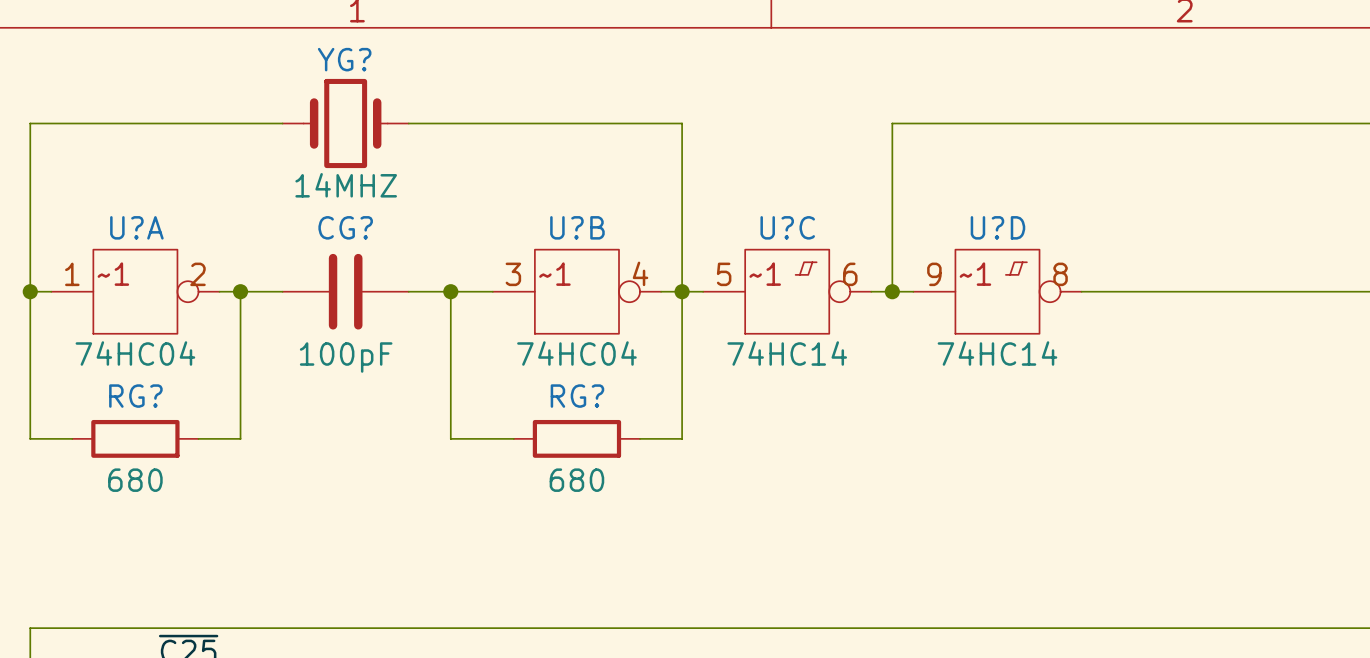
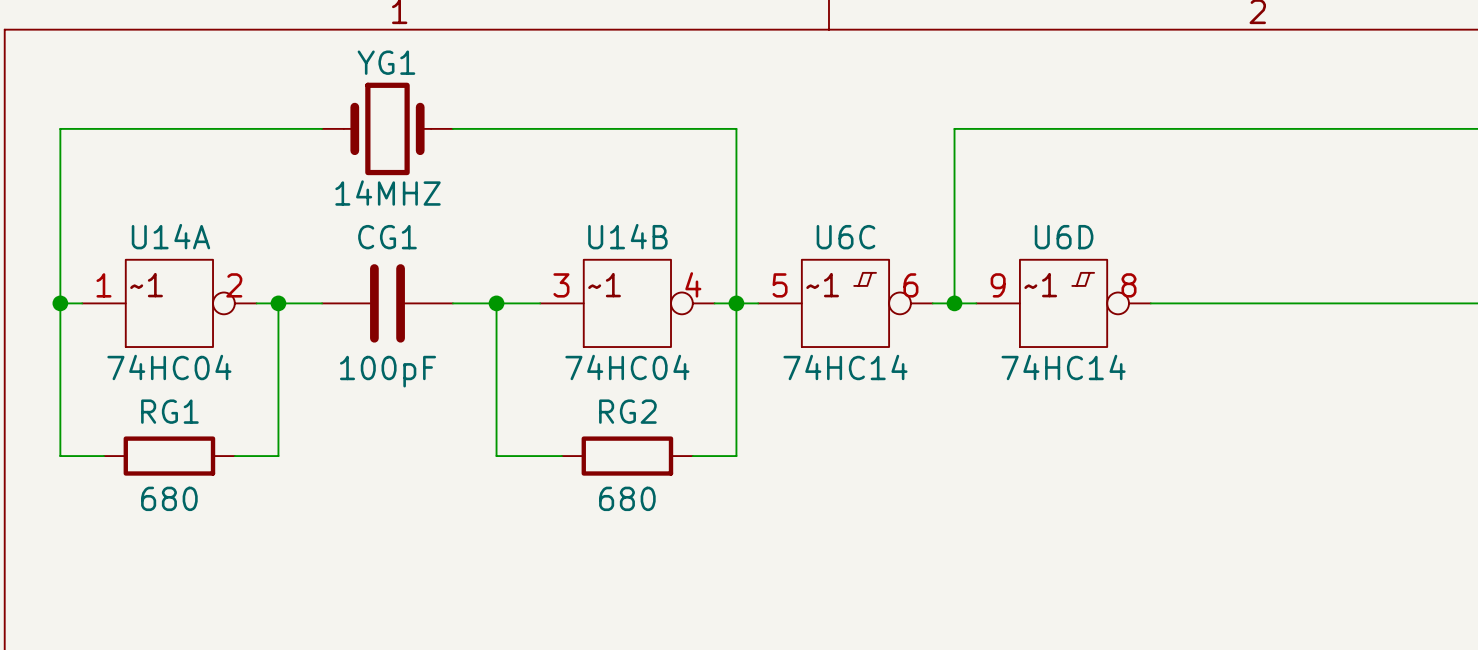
YG? name: YG? (344, 59) -> YG1 (386, 62)
U?A name: U?A (136, 227) -> U14A (170, 236)
CG? name: CG? (345, 227) -> CG1 (387, 237)
U?B name: U?B (577, 227) -> U14B (627, 236)
U?C name: U?C (787, 227) -> U6C (845, 237)
U?D name: U?D (997, 227) -> U6D (1064, 237)
RG? name: RG? (135, 396) -> RG1 (169, 411)
RG? name: RG? (577, 396) -> RG2 (627, 411)

